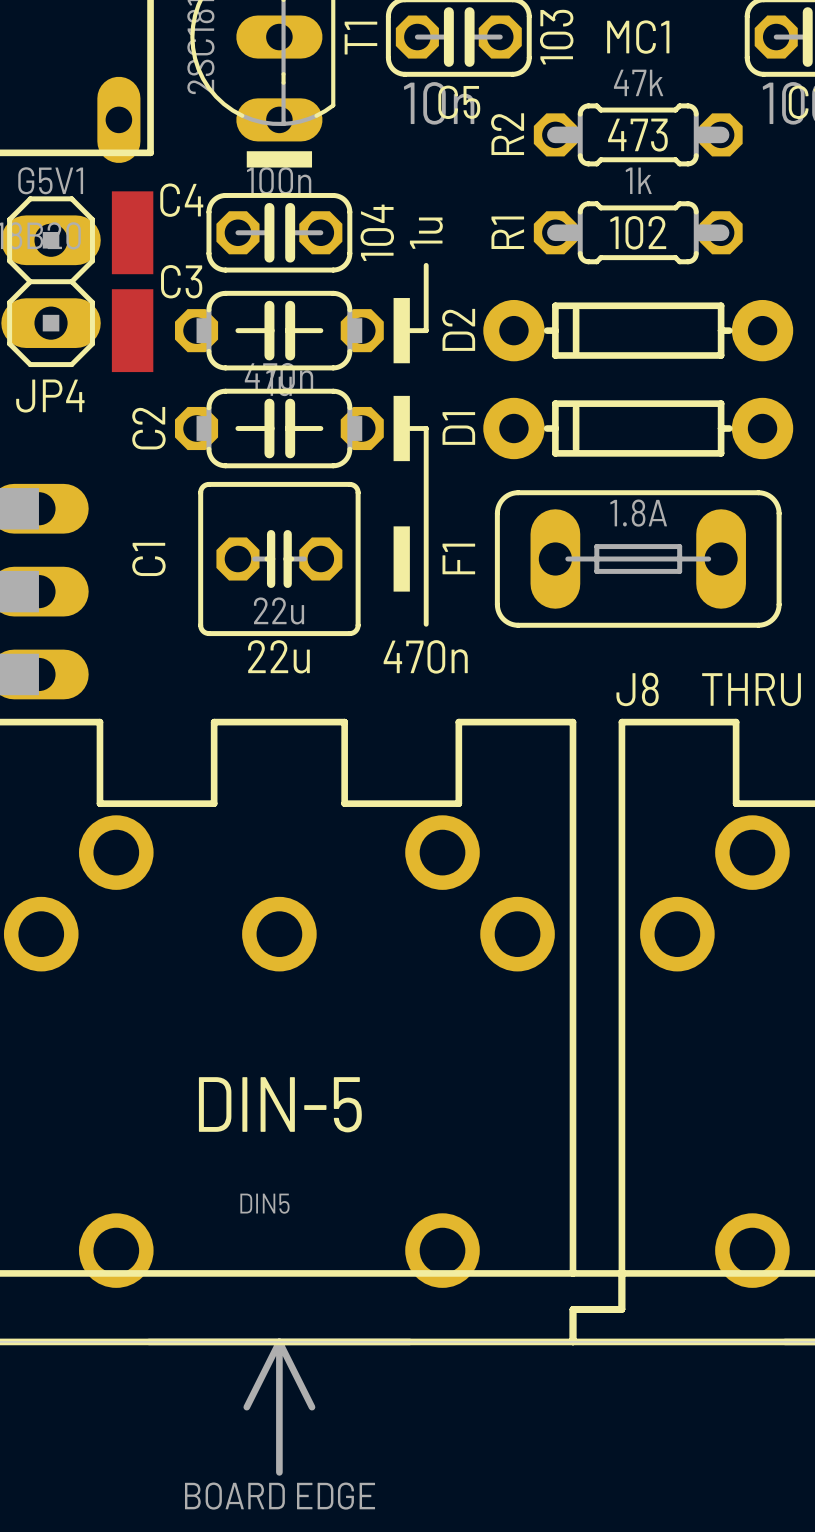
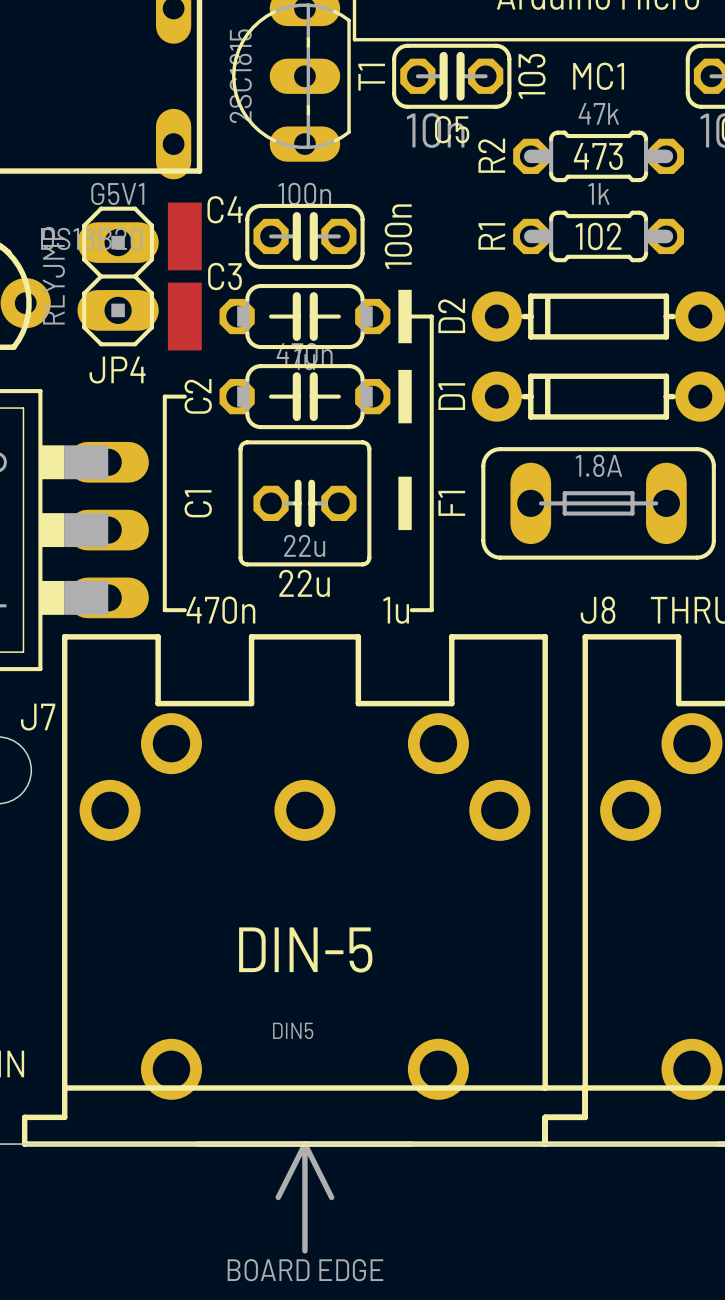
drawing: [246, 151, 313, 168] -> none
text: 104 (377, 232) -> none
text: none -> 100n (398, 236)
text rotation: 0° (426, 233) -> 90° clockwise (396, 610)
text position: 1u (426, 233) -> 1u (396, 610)
line: (426, 265) (426, 330) -> (411, 610) (431, 610) (431, 316) (425, 316)
line: none -> (184, 396) (164, 396) (164, 610) (184, 610)
line: (409, 428) (426, 428) (426, 624) -> none
text position: 470n (425, 656) -> 470n (220, 610)

